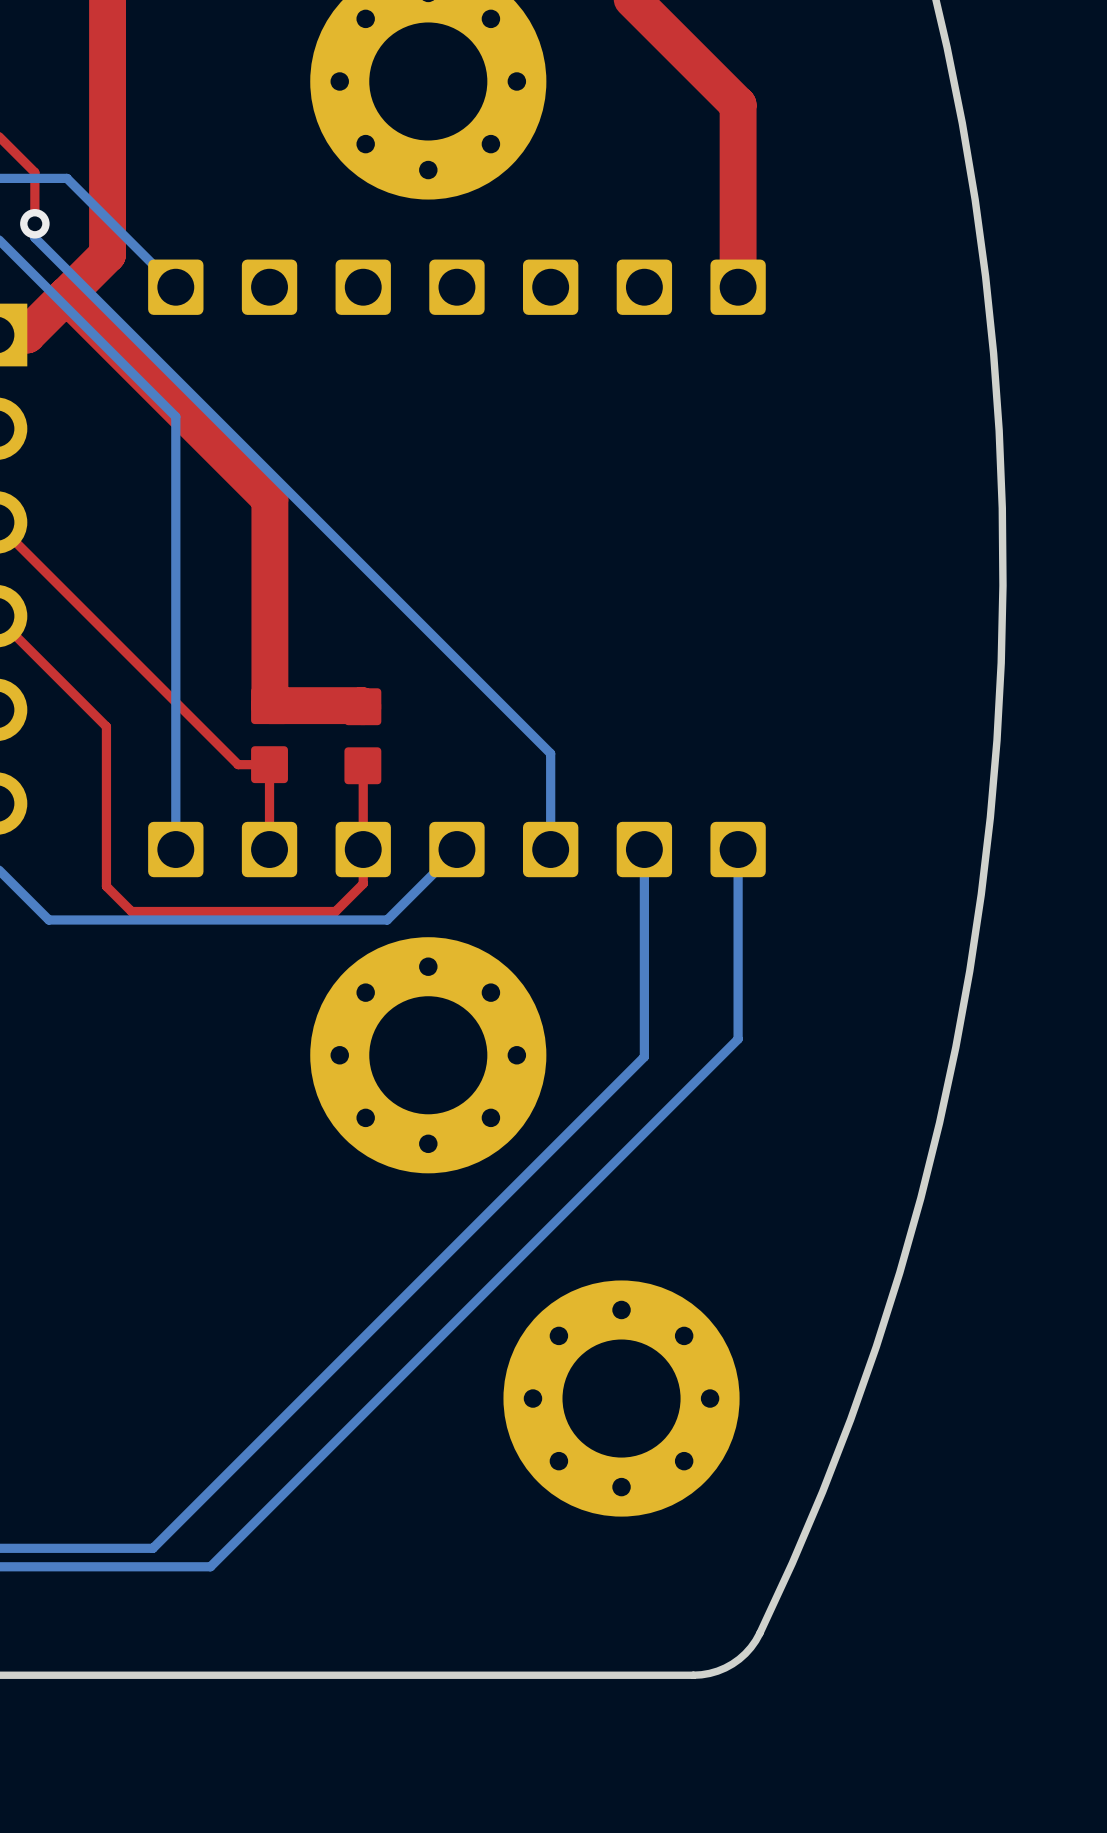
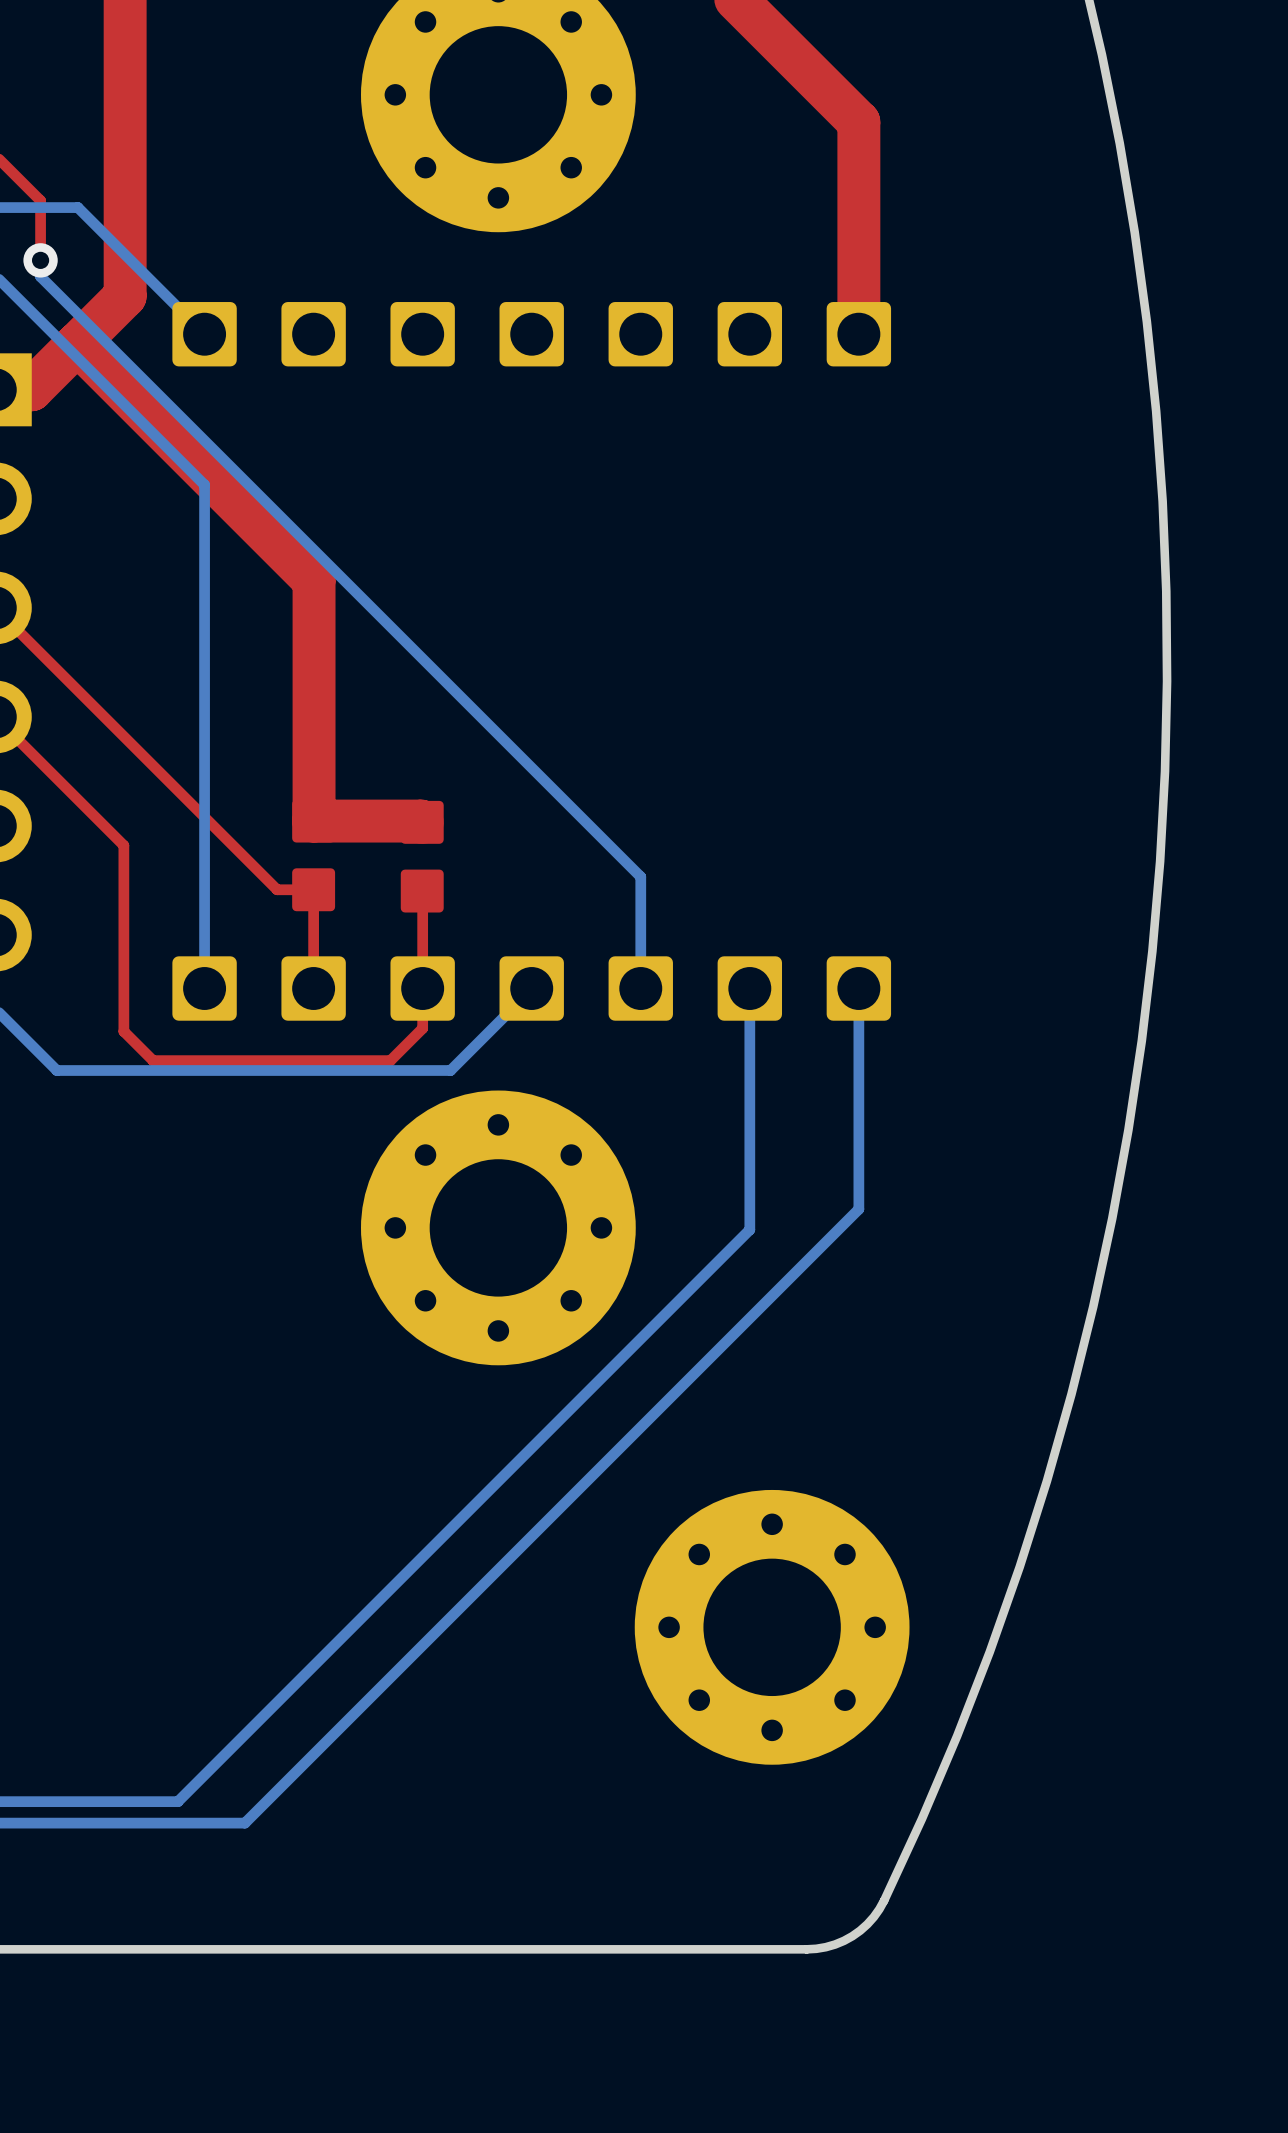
part position: (621, 1398) -> (772, 1627)

